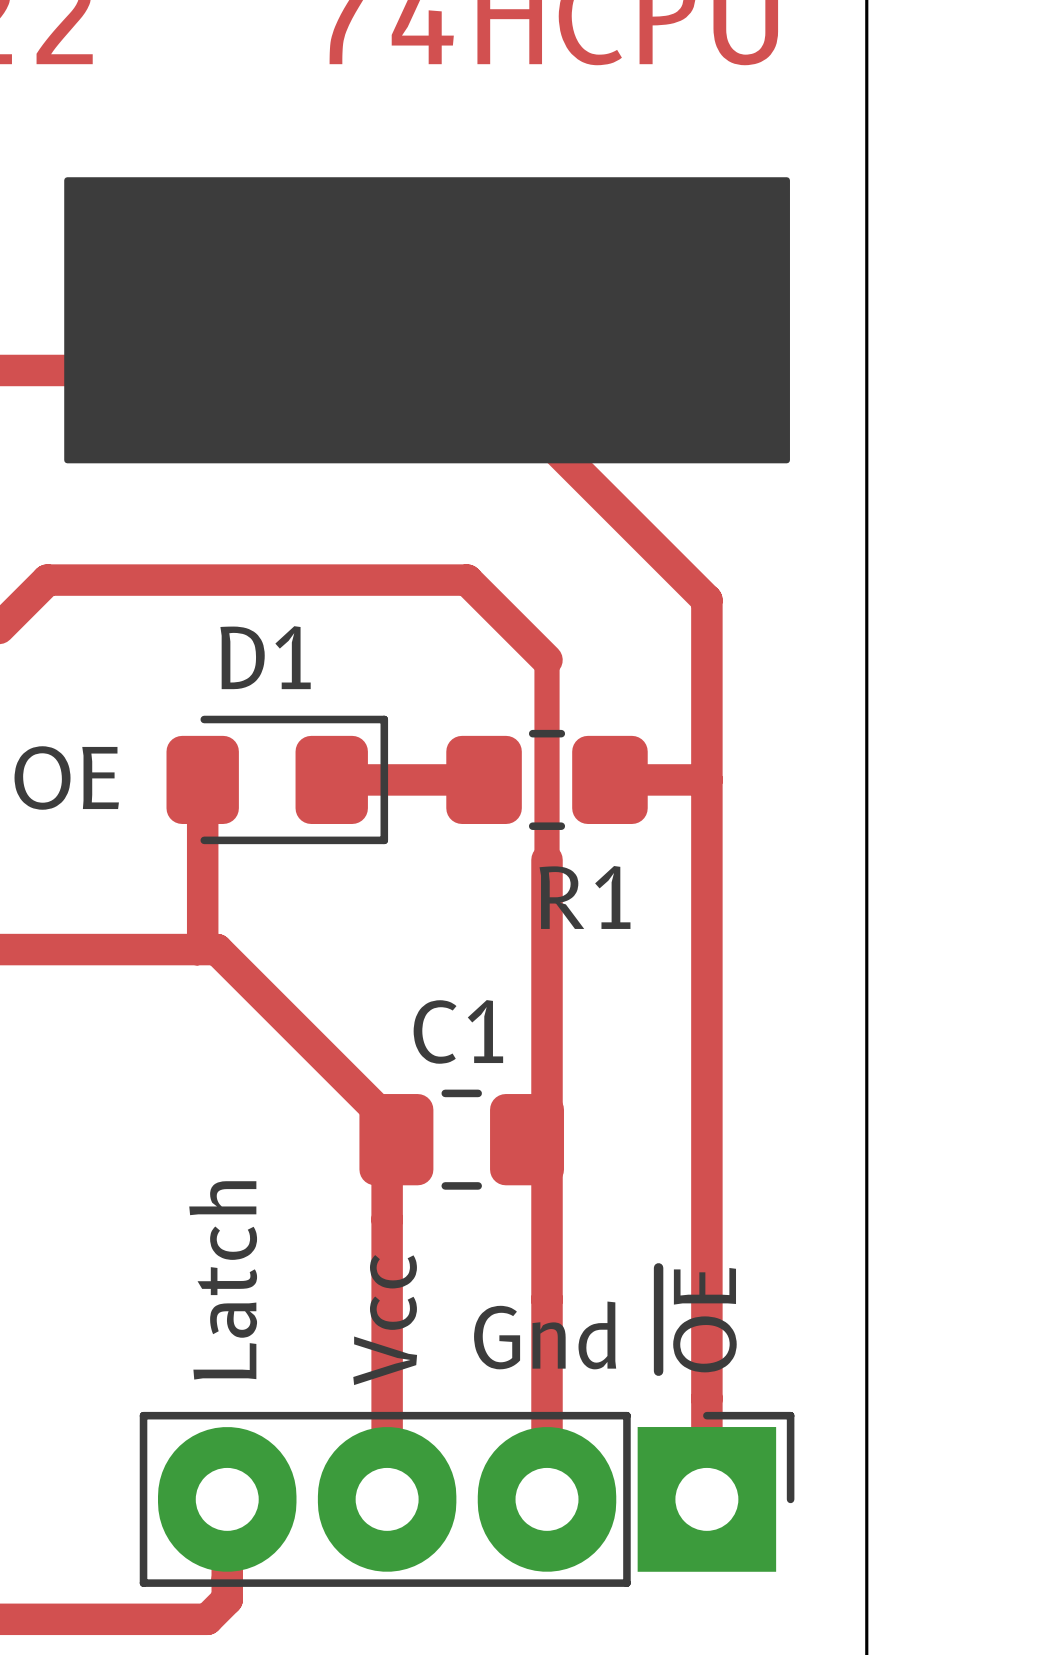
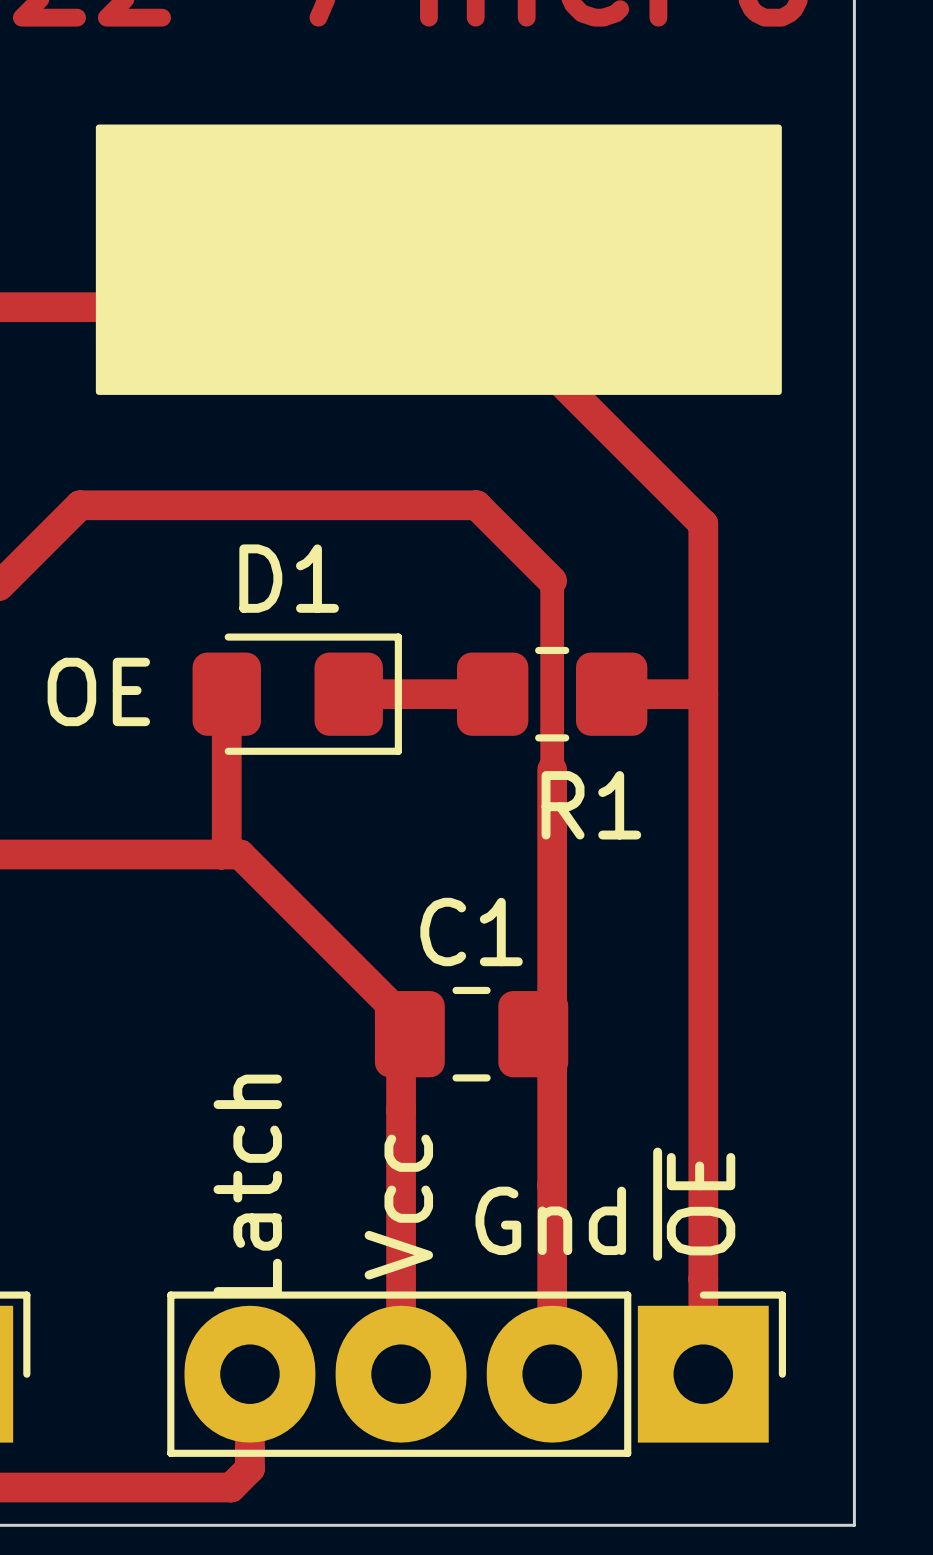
text position: Latch (223, 1280) -> Latch (247, 1185)

